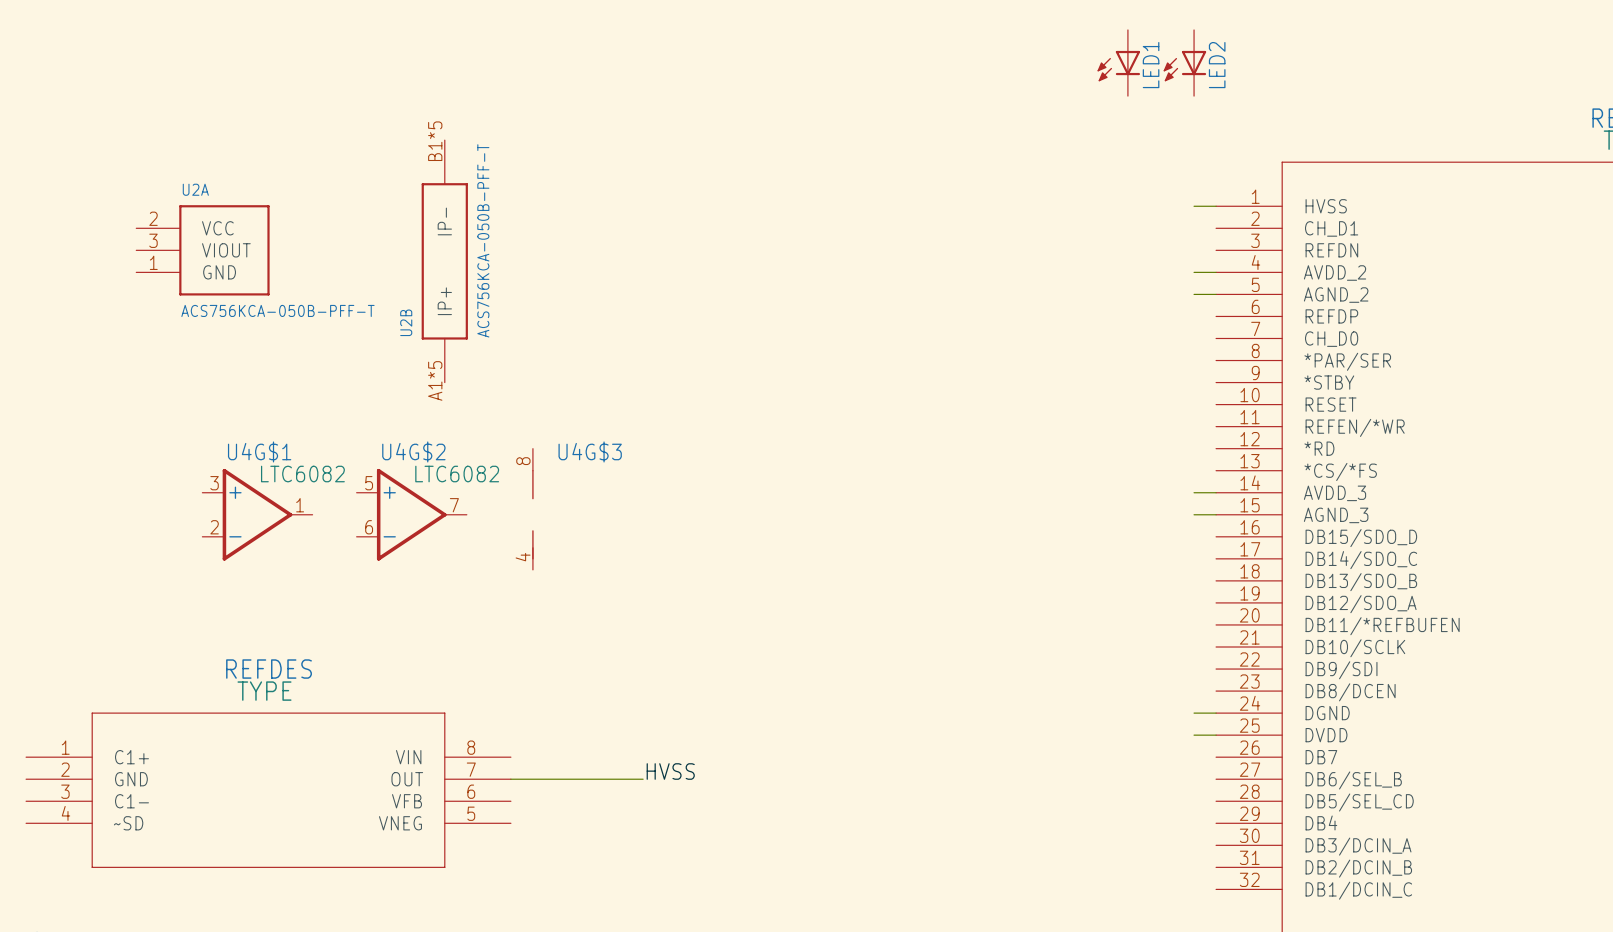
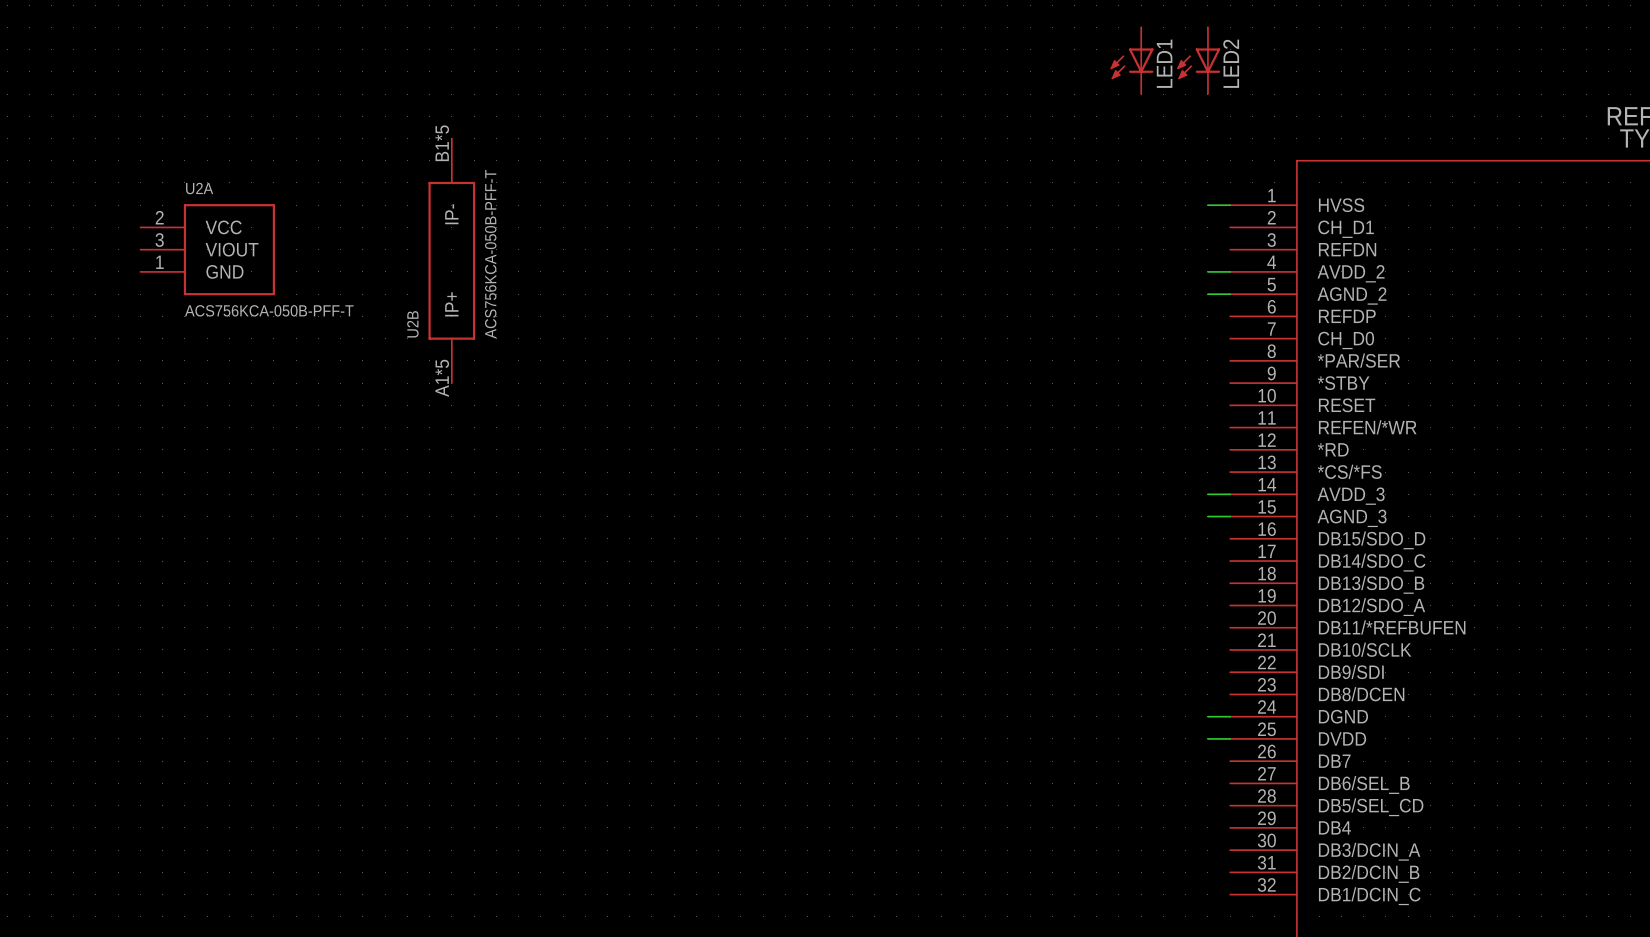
U4G$3: (532, 509) -> none
U4G$1: LTC6082 (257, 514) -> none
U4G$2: LTC6082 (411, 514) -> none
label: HVSS (670, 771) -> none
wire: (510, 779) (643, 779) -> none
part: (268, 790) -> none

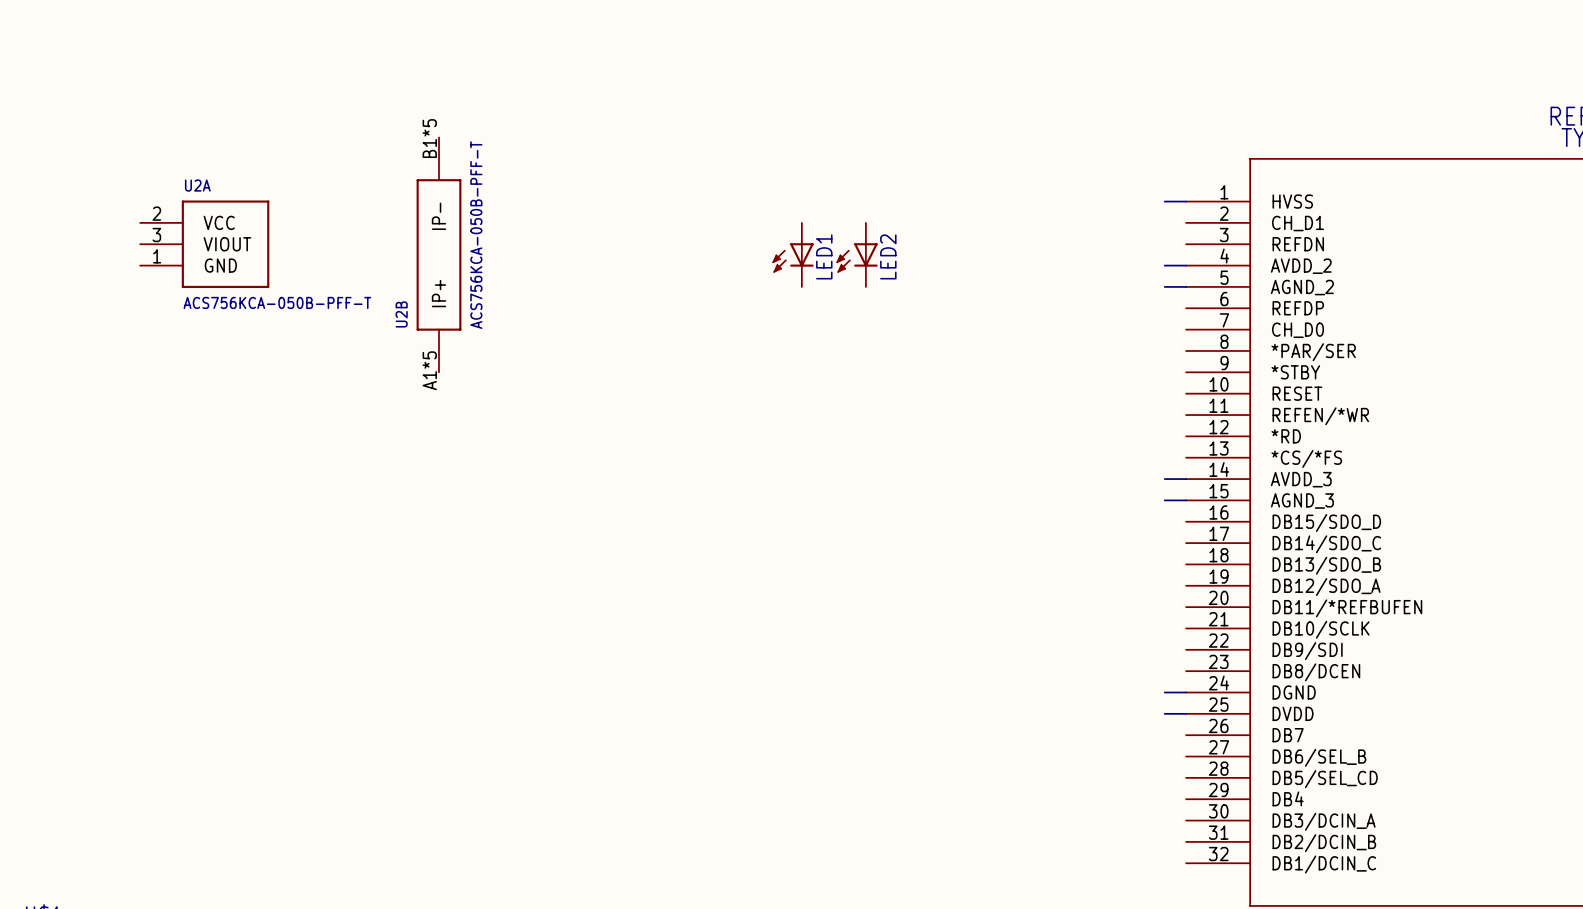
LED1 position: (1132, 60) -> (793, 254)
LED2 position: (1198, 60) -> (857, 254)

